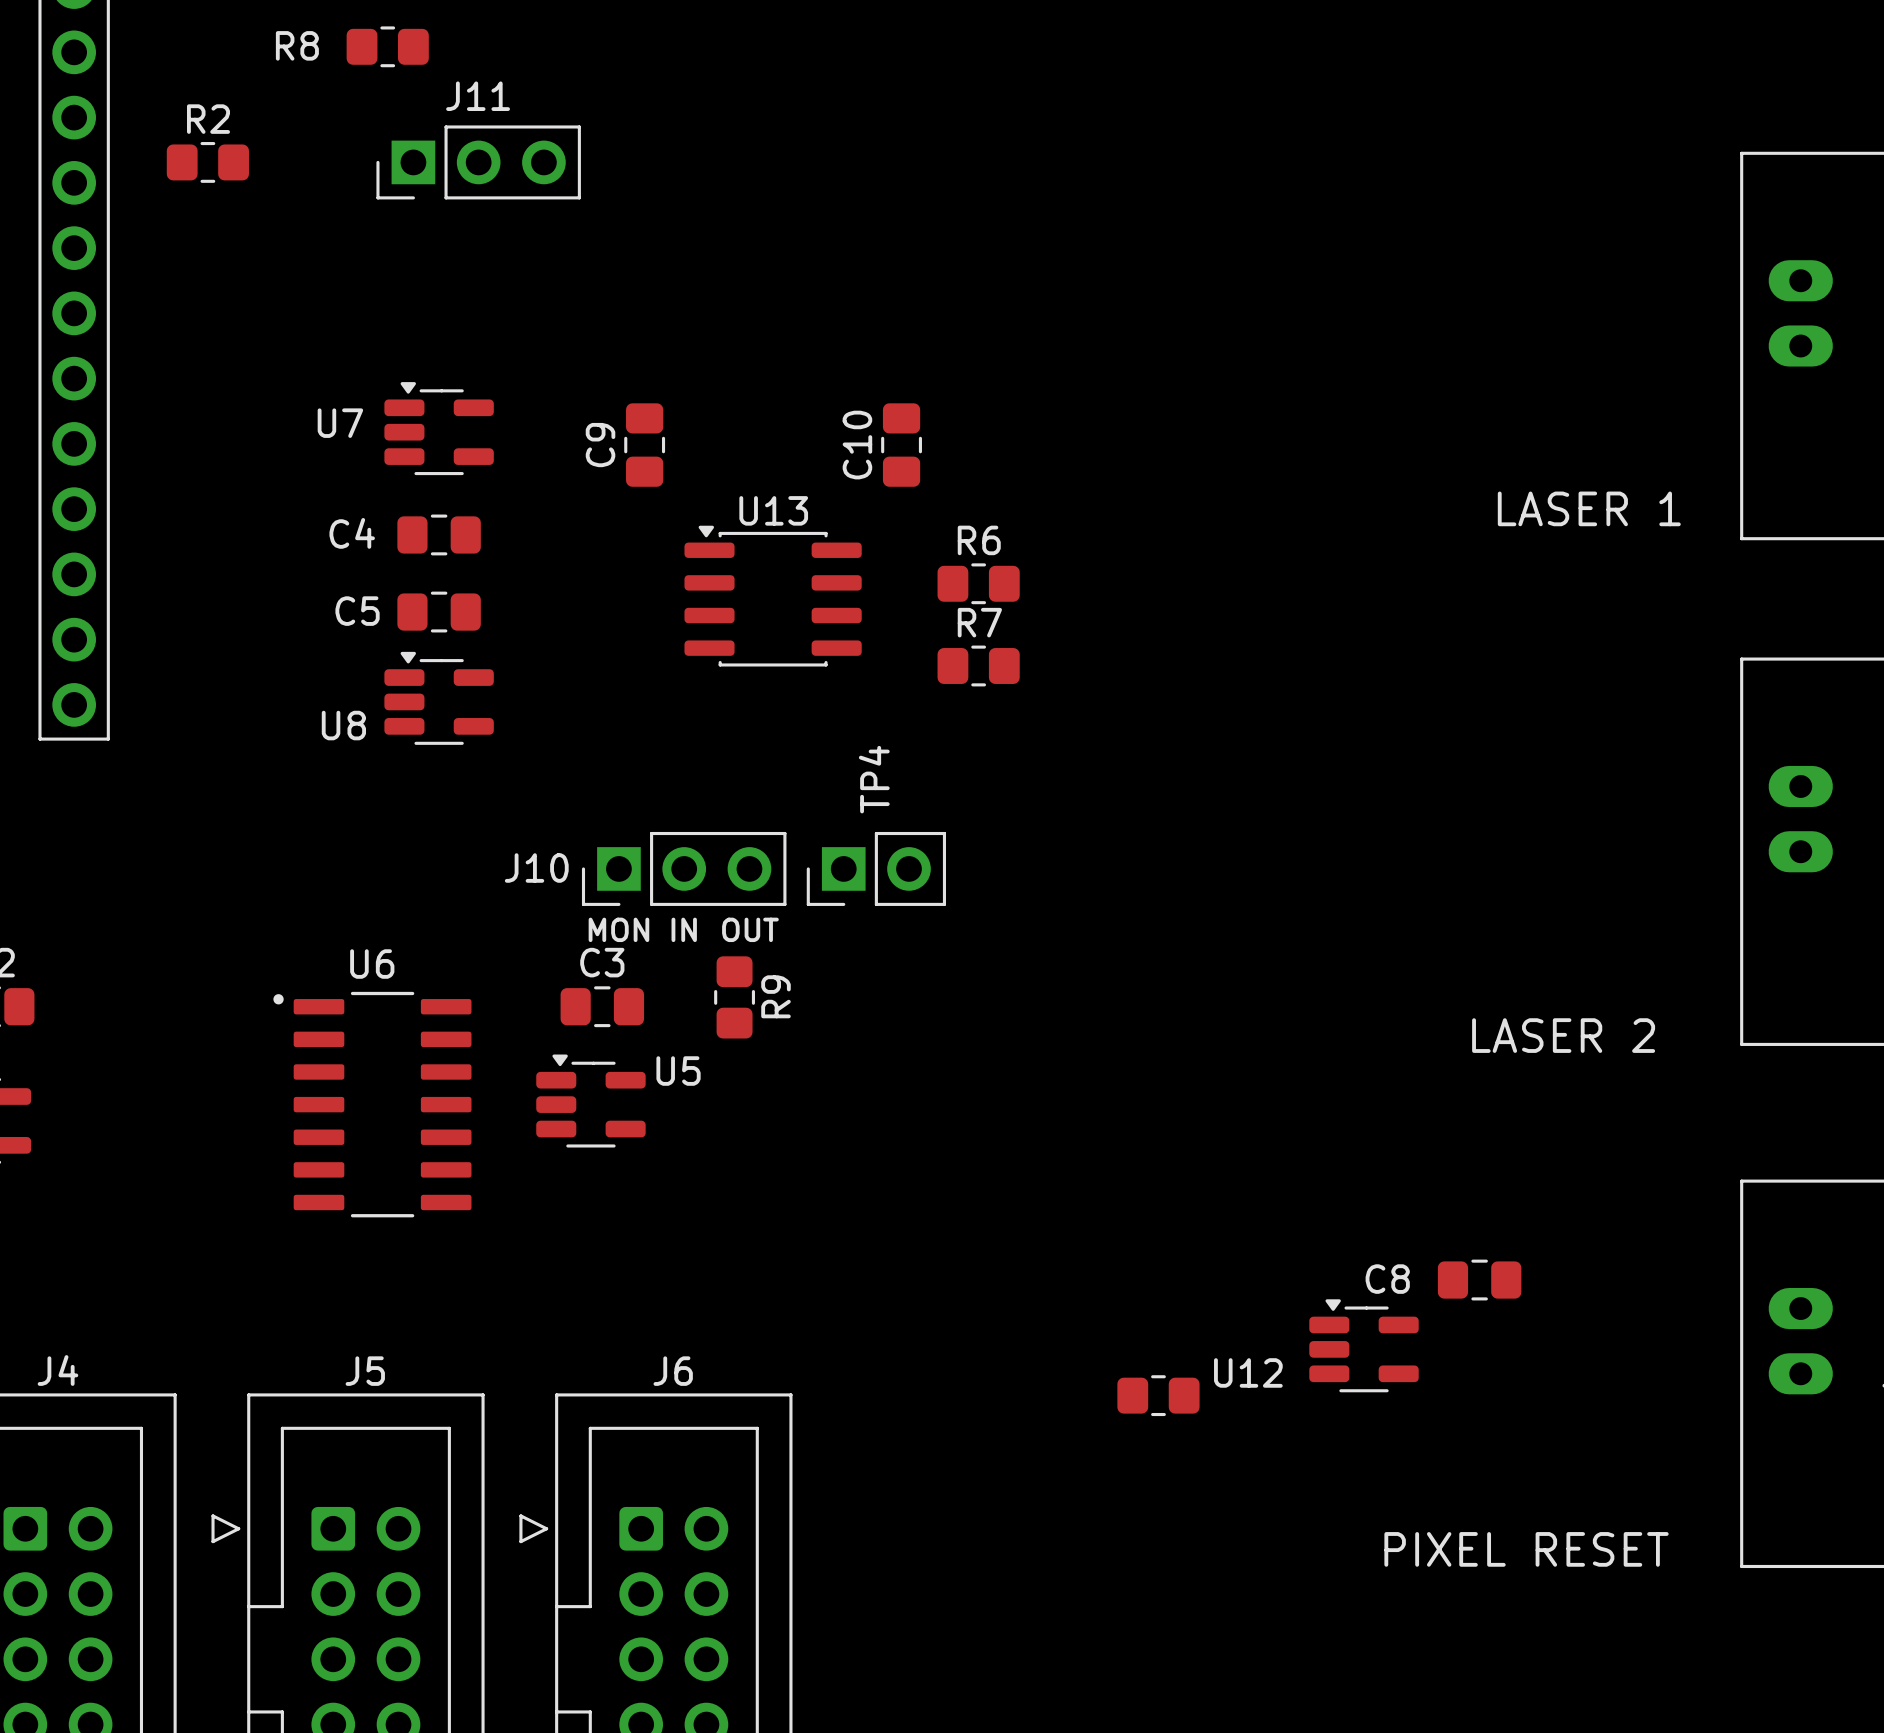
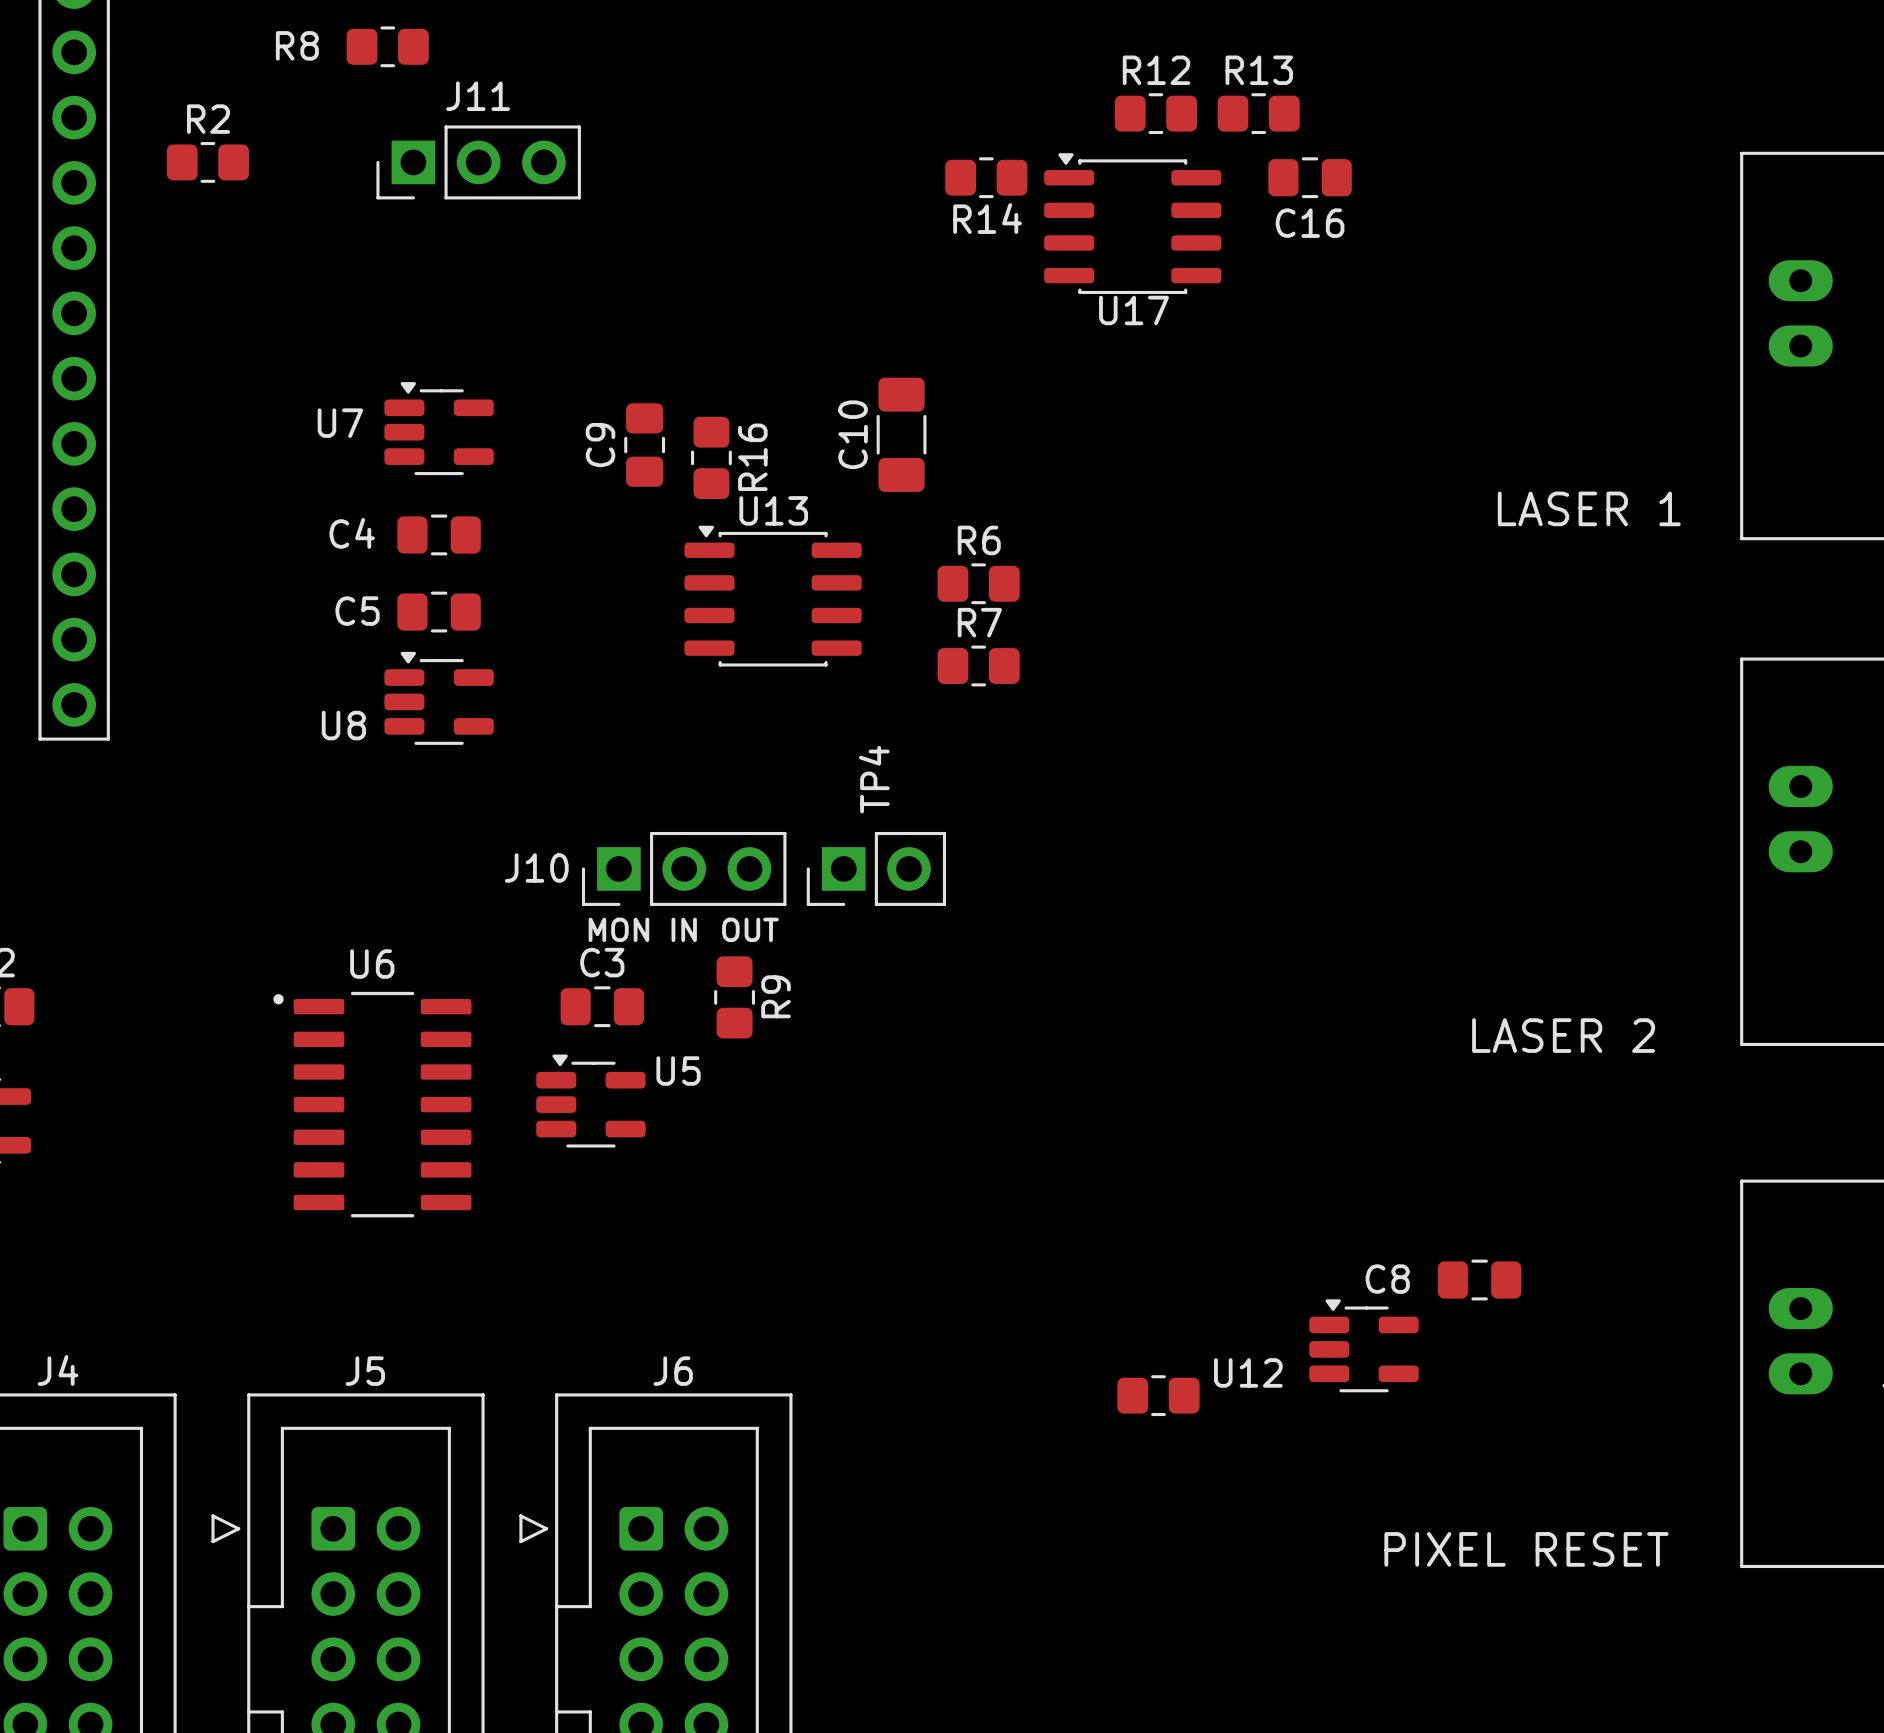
R12: none -> (1155, 113)
R13: none -> (1258, 113)
R14: none -> (986, 177)
C16: none -> (1310, 177)
U17: none -> (1132, 223)
C10 footprint: [881, 403, 922, 487] -> [876, 377, 927, 492]
R16: none -> (711, 457)

